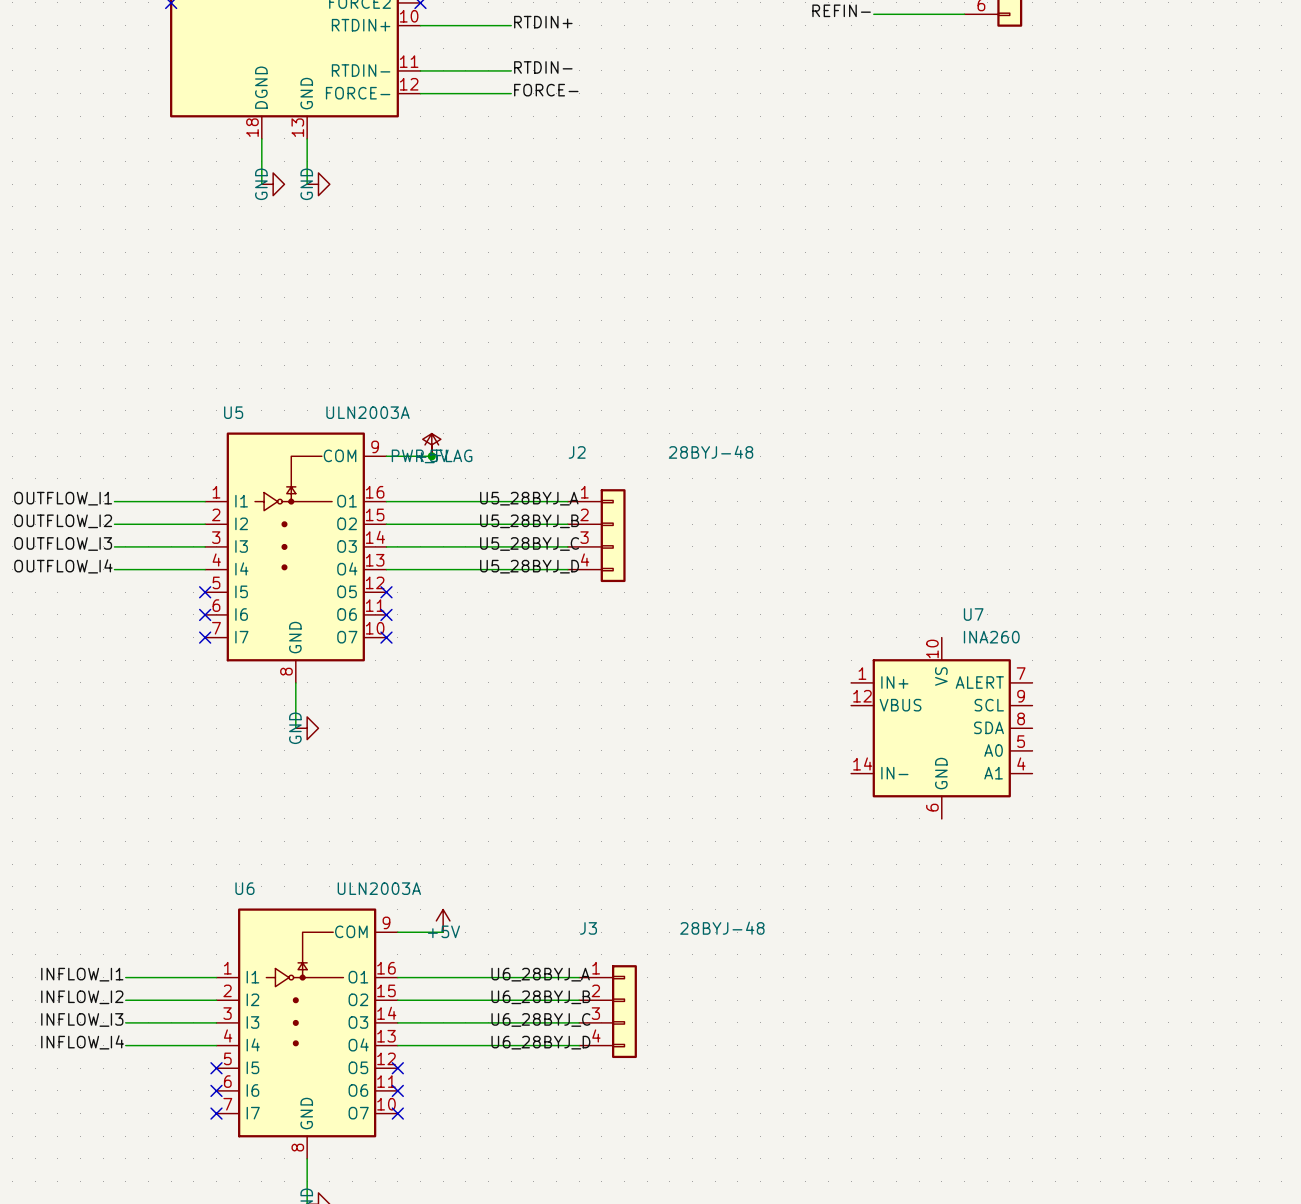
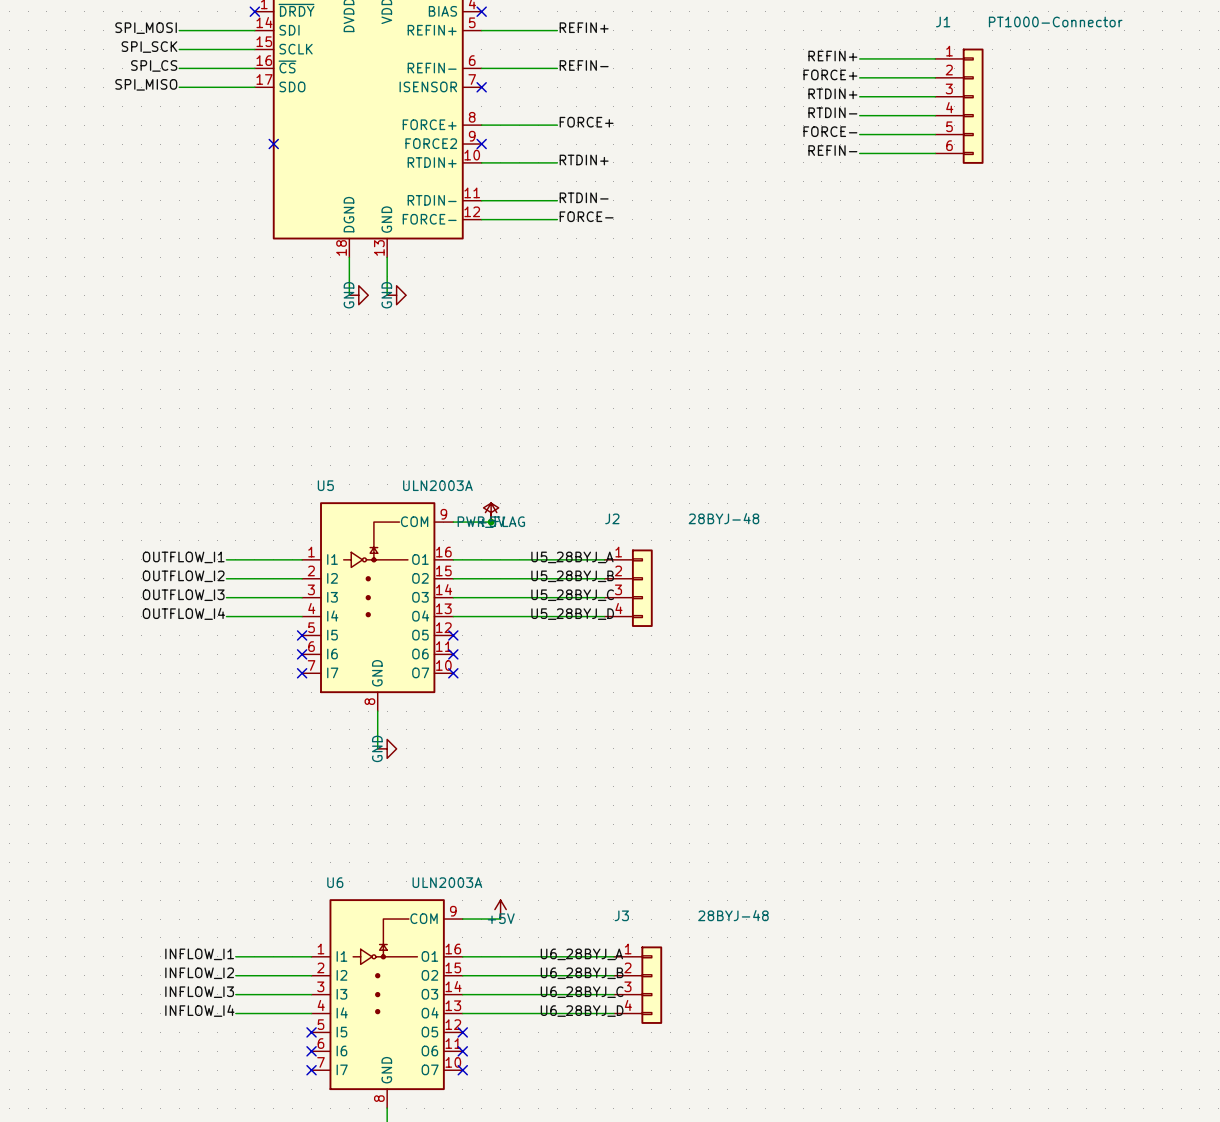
U7: INA260 (941, 728) -> none

